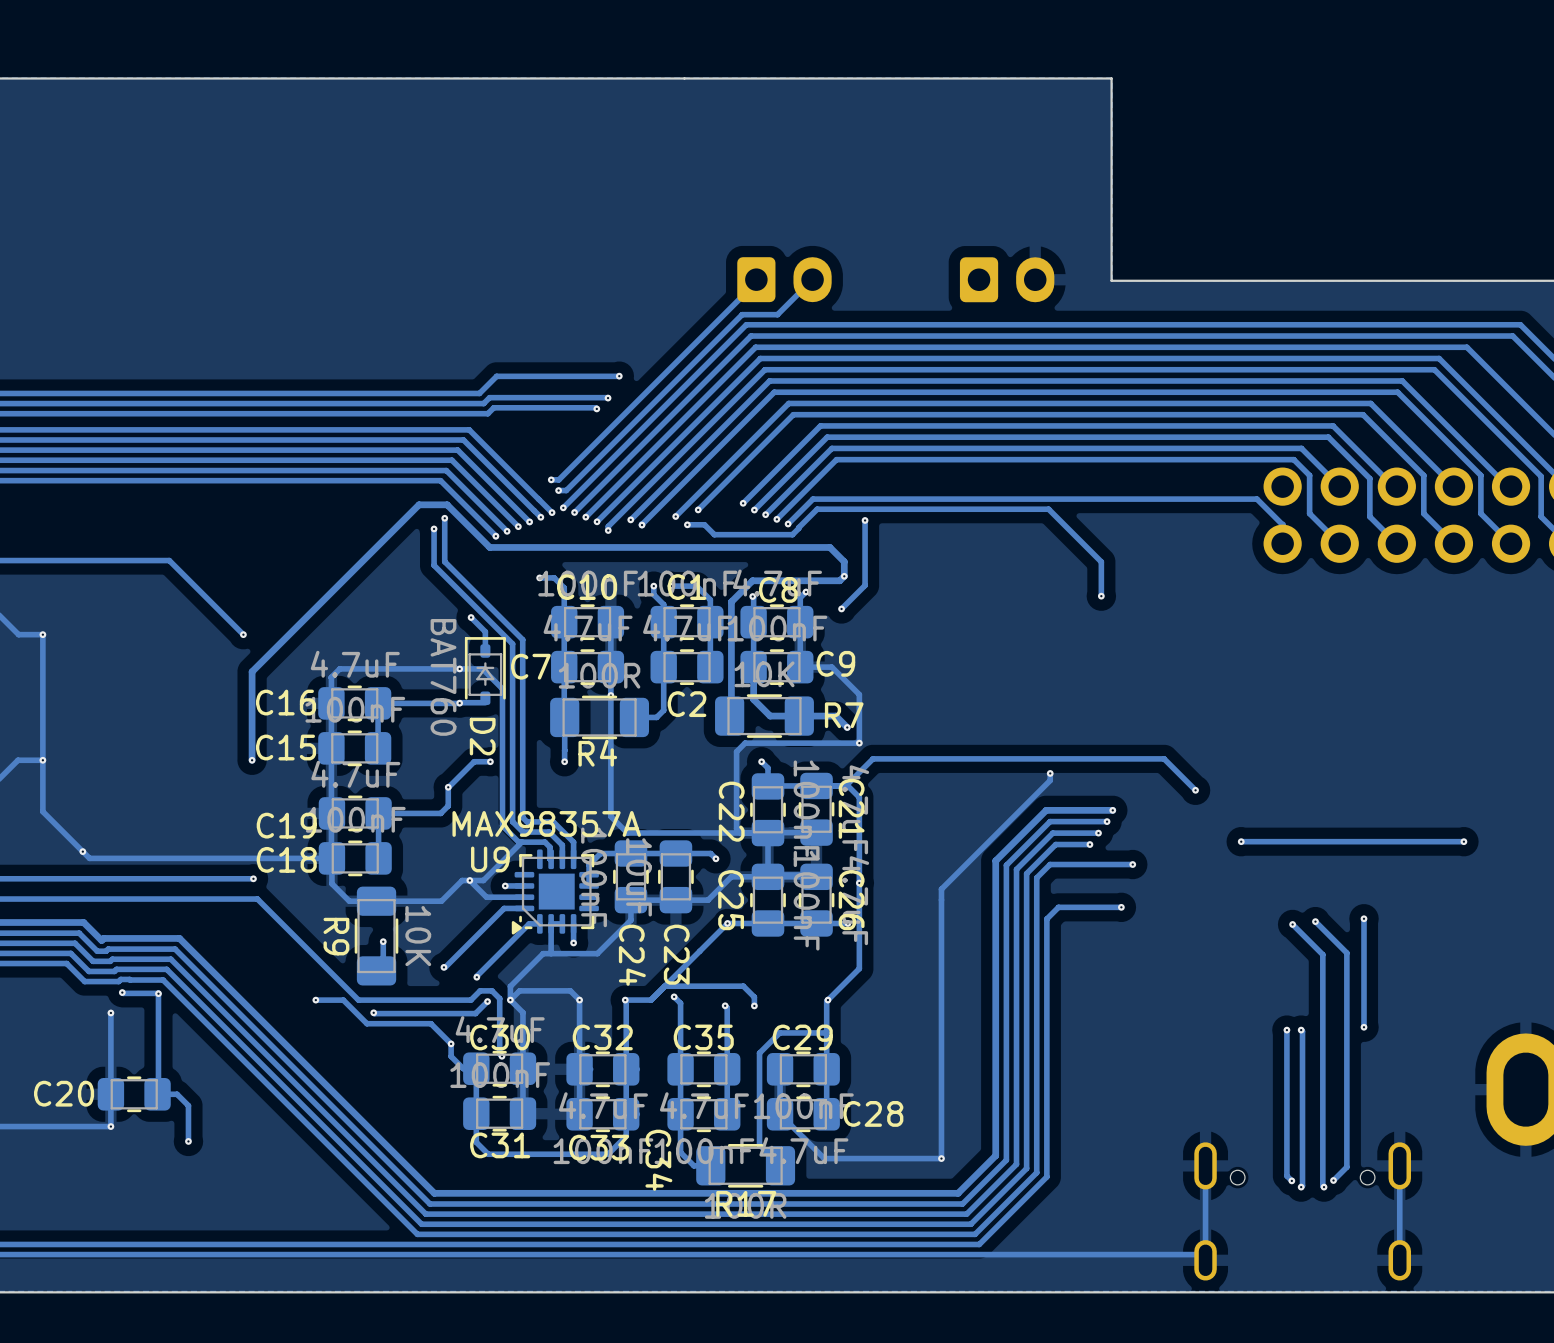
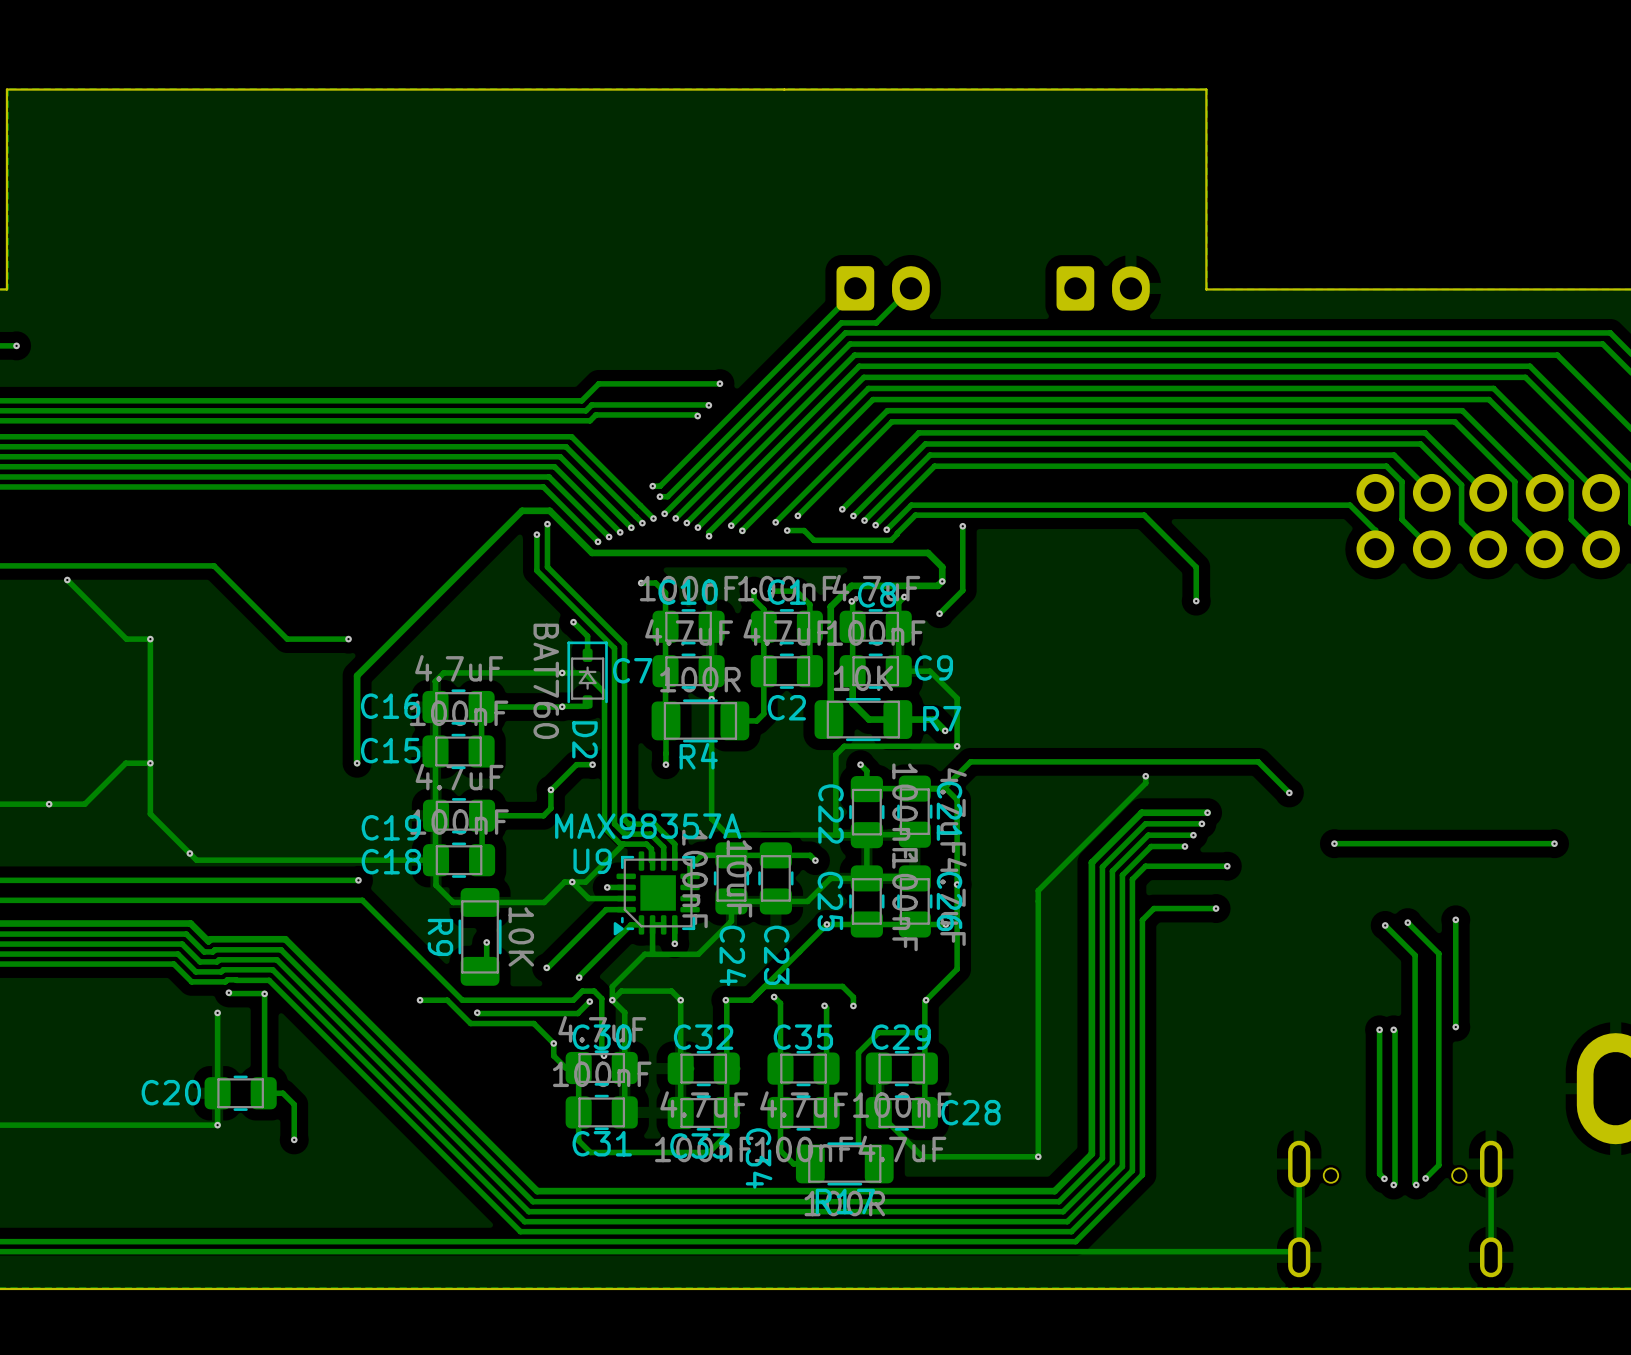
track: (107, 560) (169, 560) (243, 634) -> (214, 565) (287, 639) (348, 639)

